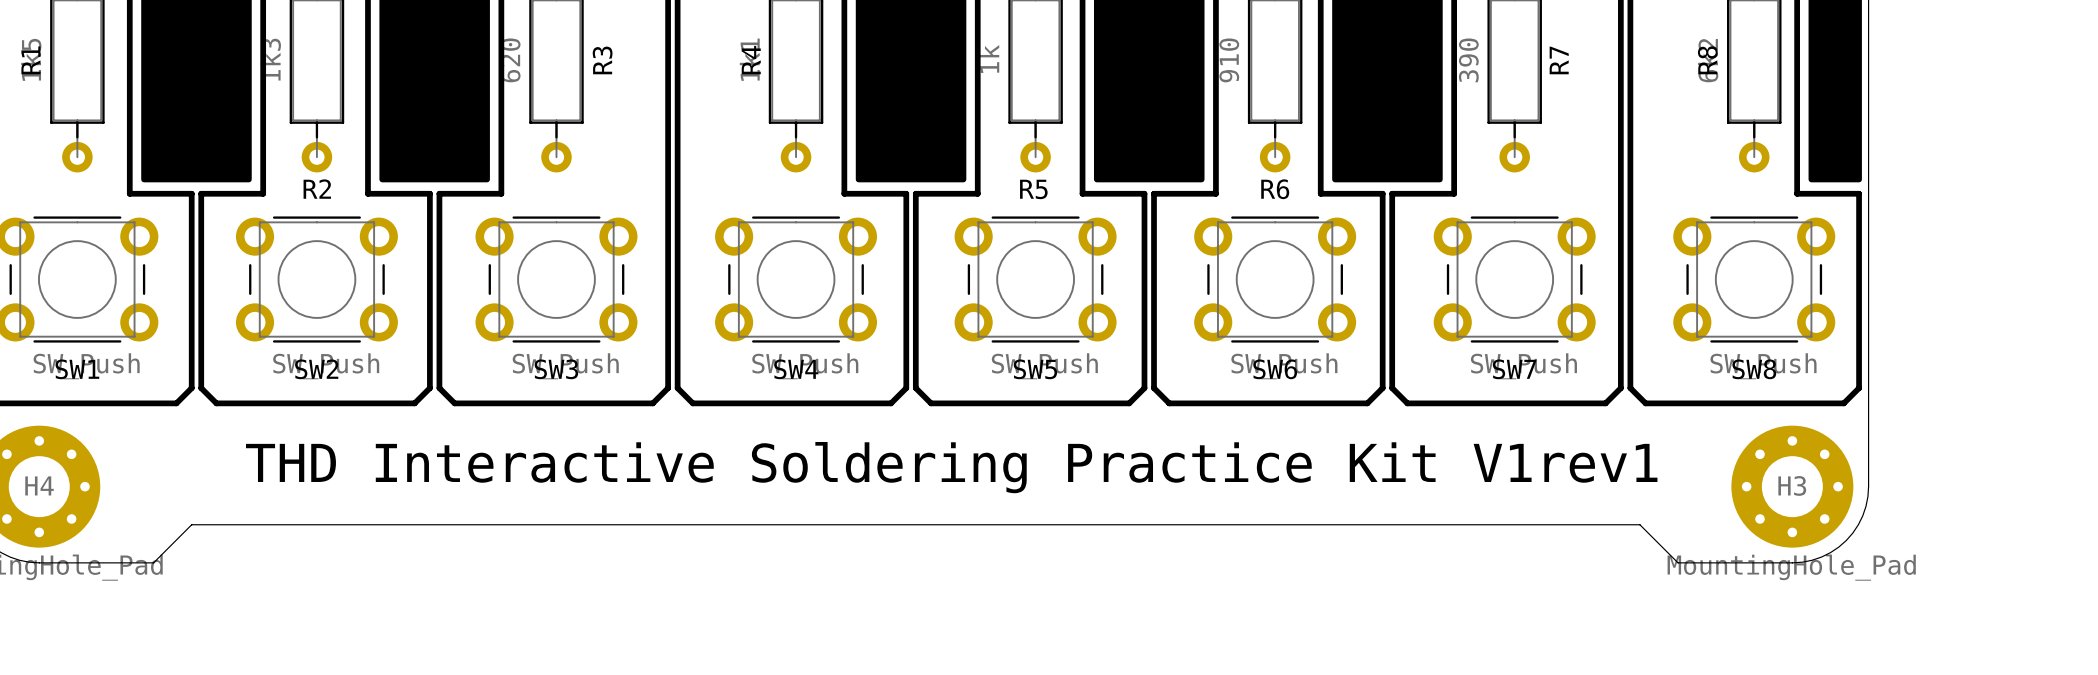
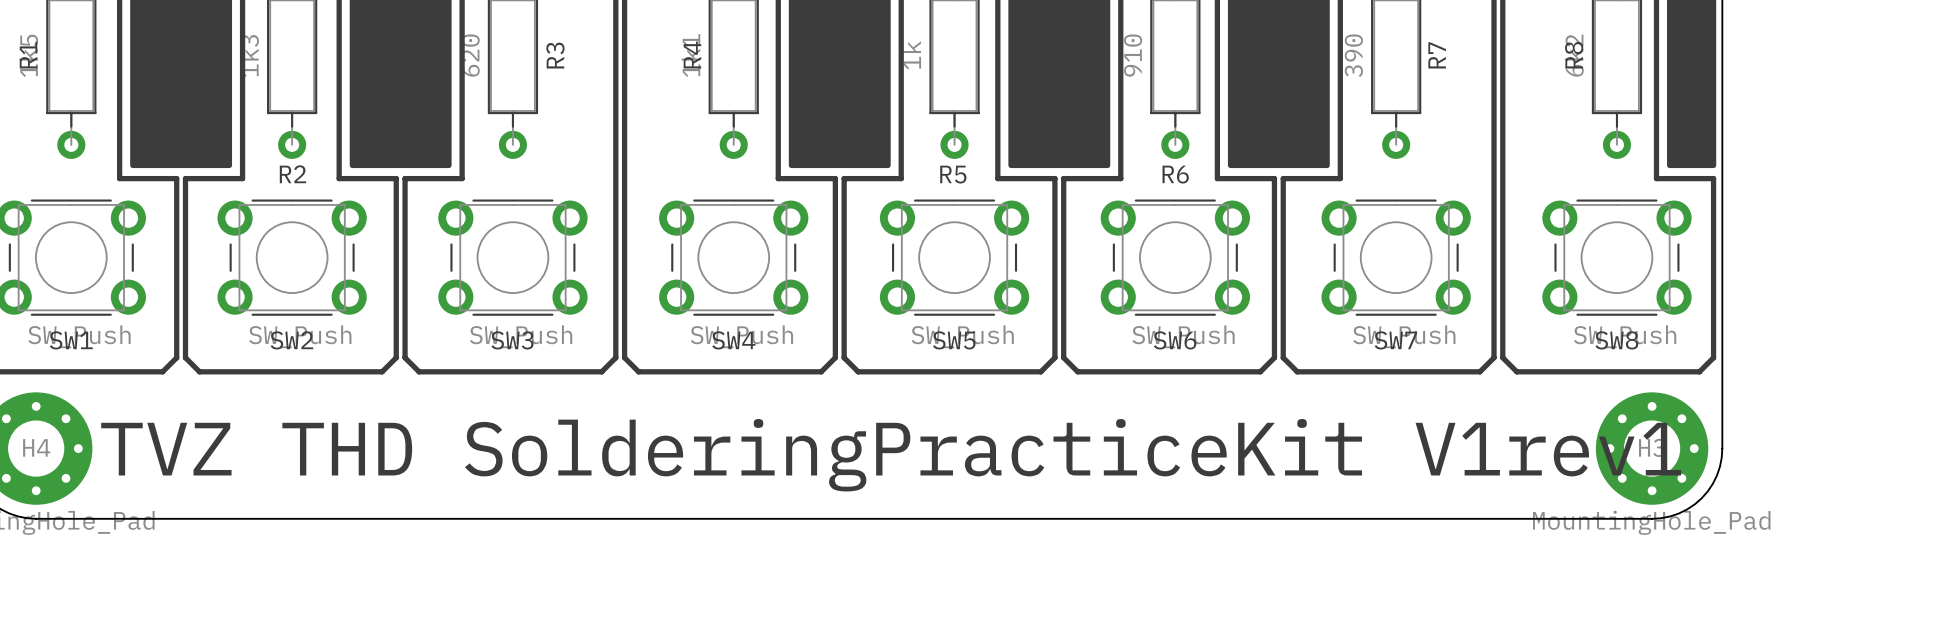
text: THD Interactive Soldering Practice Kit V1rev1 (951, 467) -> TVZ THD SolderingPracticeKit V1rev1 (891, 455)
board edge: (153, 562) (191, 524) (1639, 524) (1678, 562) -> (141, 518) (1546, 518)

